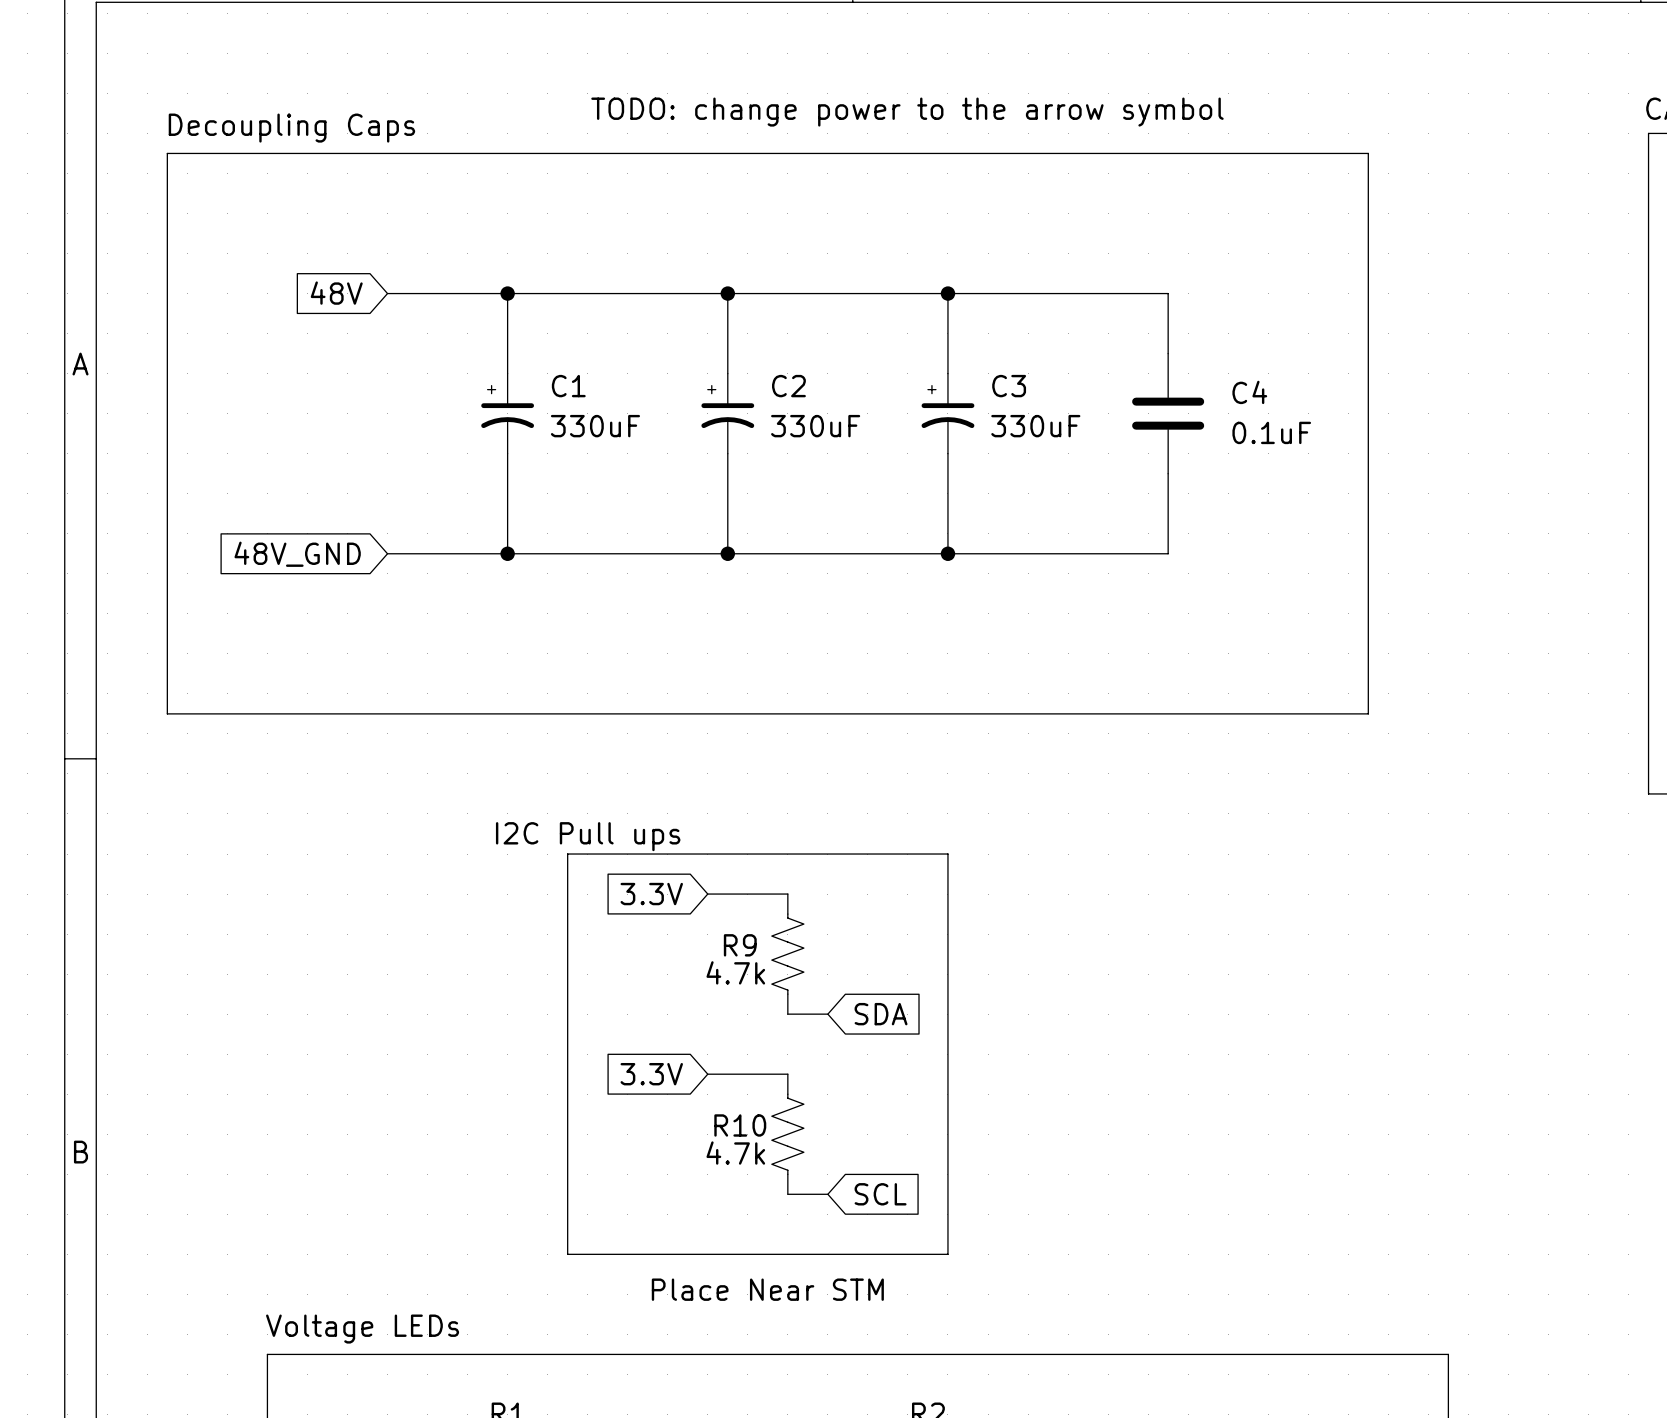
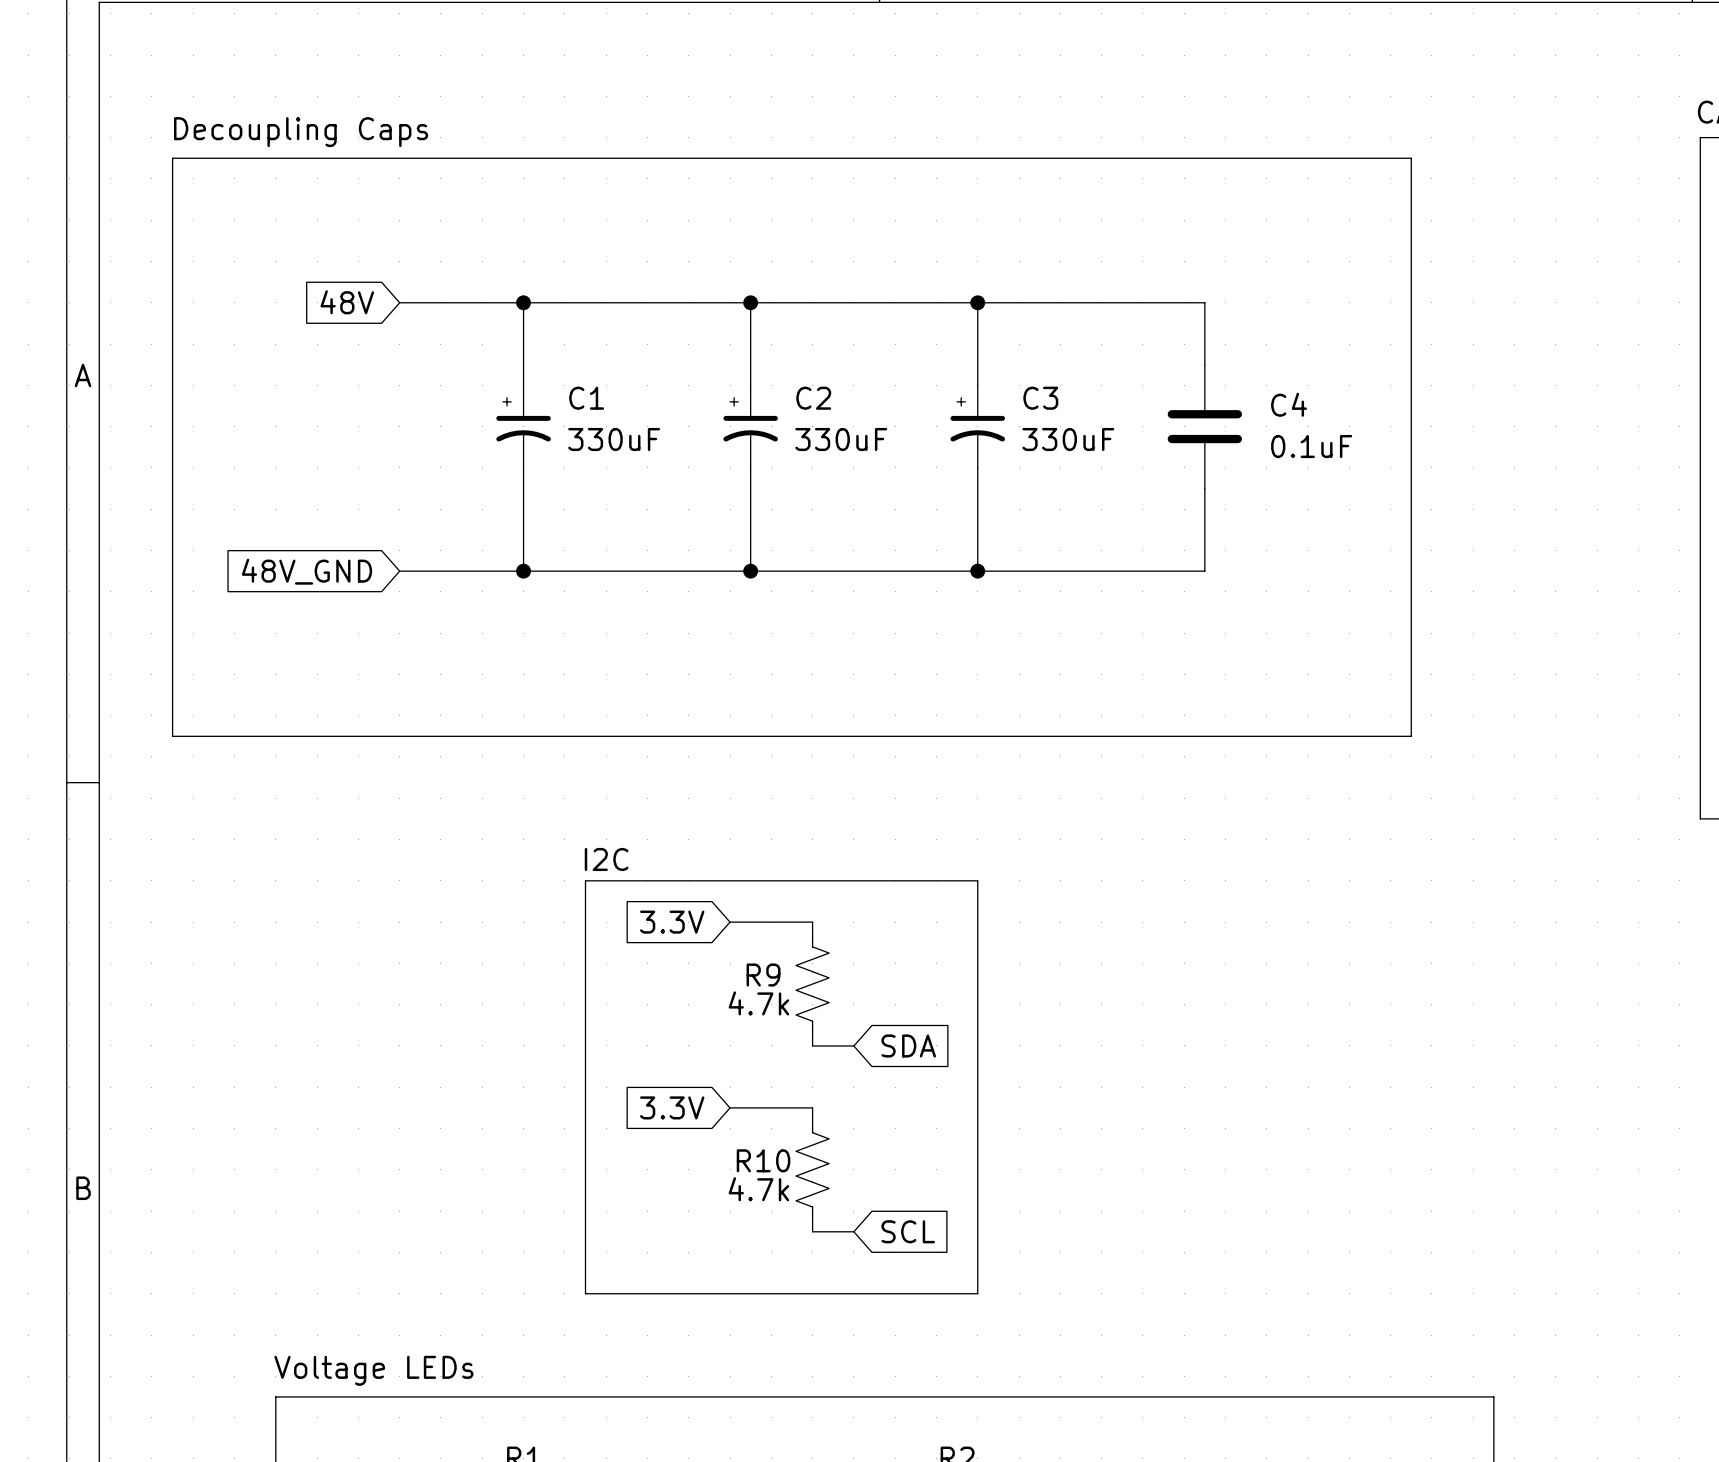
text: TODO: change power to the arrow symbol (907, 112) -> none
text: I2C Pull ups (588, 836) -> I2C (606, 859)
text: Place Near STM (767, 1289) -> none

